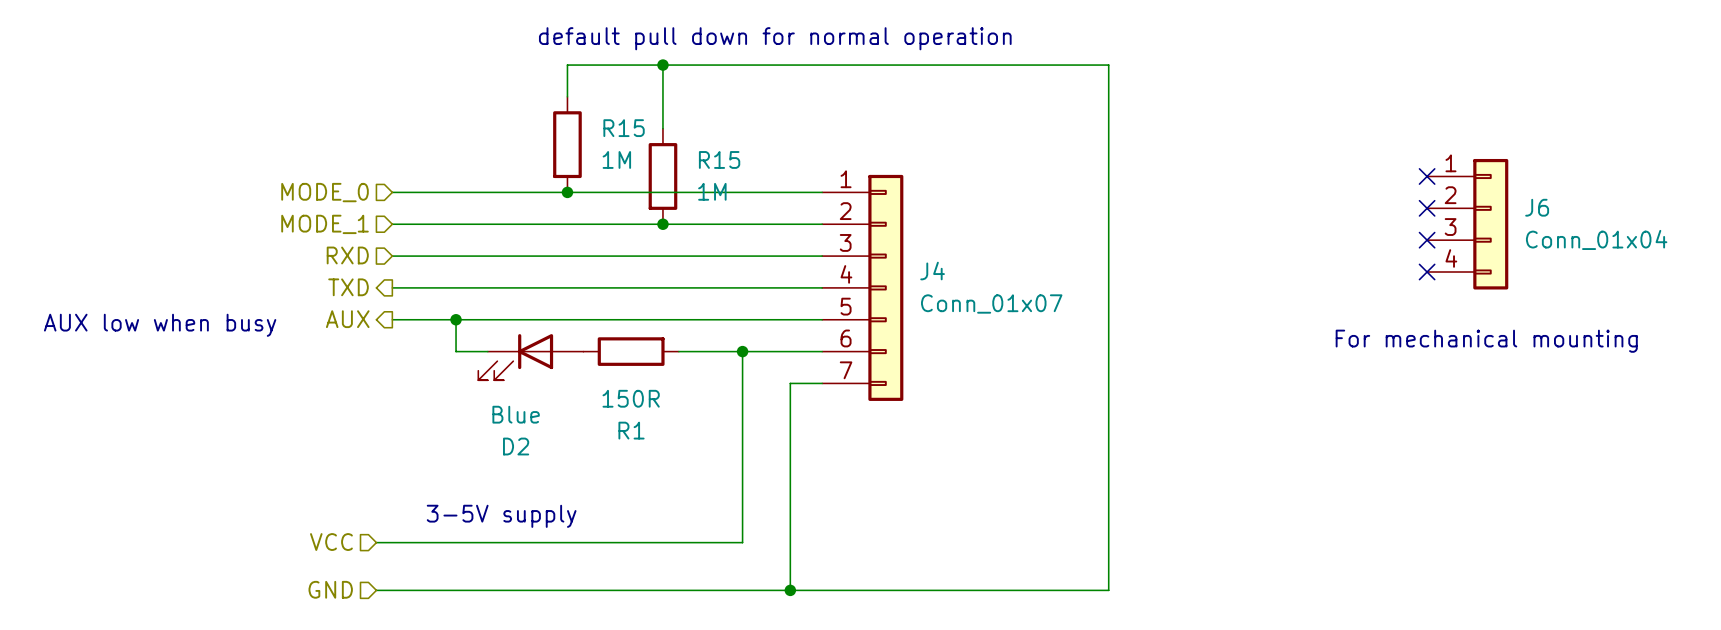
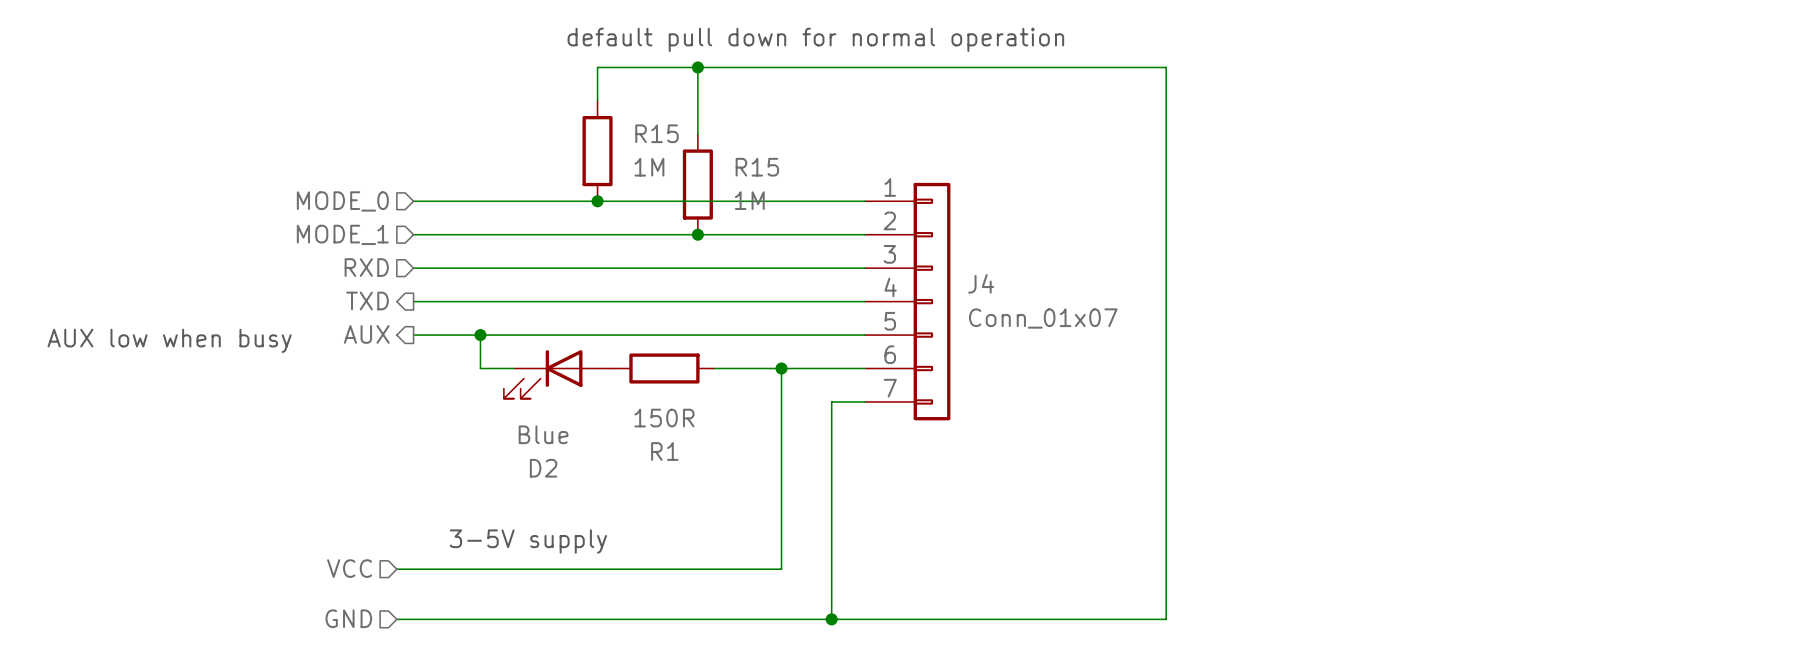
no-connect mark: (1427, 176) -> none
no-connect mark: (1427, 208) -> none
J6: Conn_01x04 (1467, 224) -> none
no-connect mark: (1427, 240) -> none
no-connect mark: (1427, 272) -> none
text: For mechanical mounting (1486, 341) -> none

